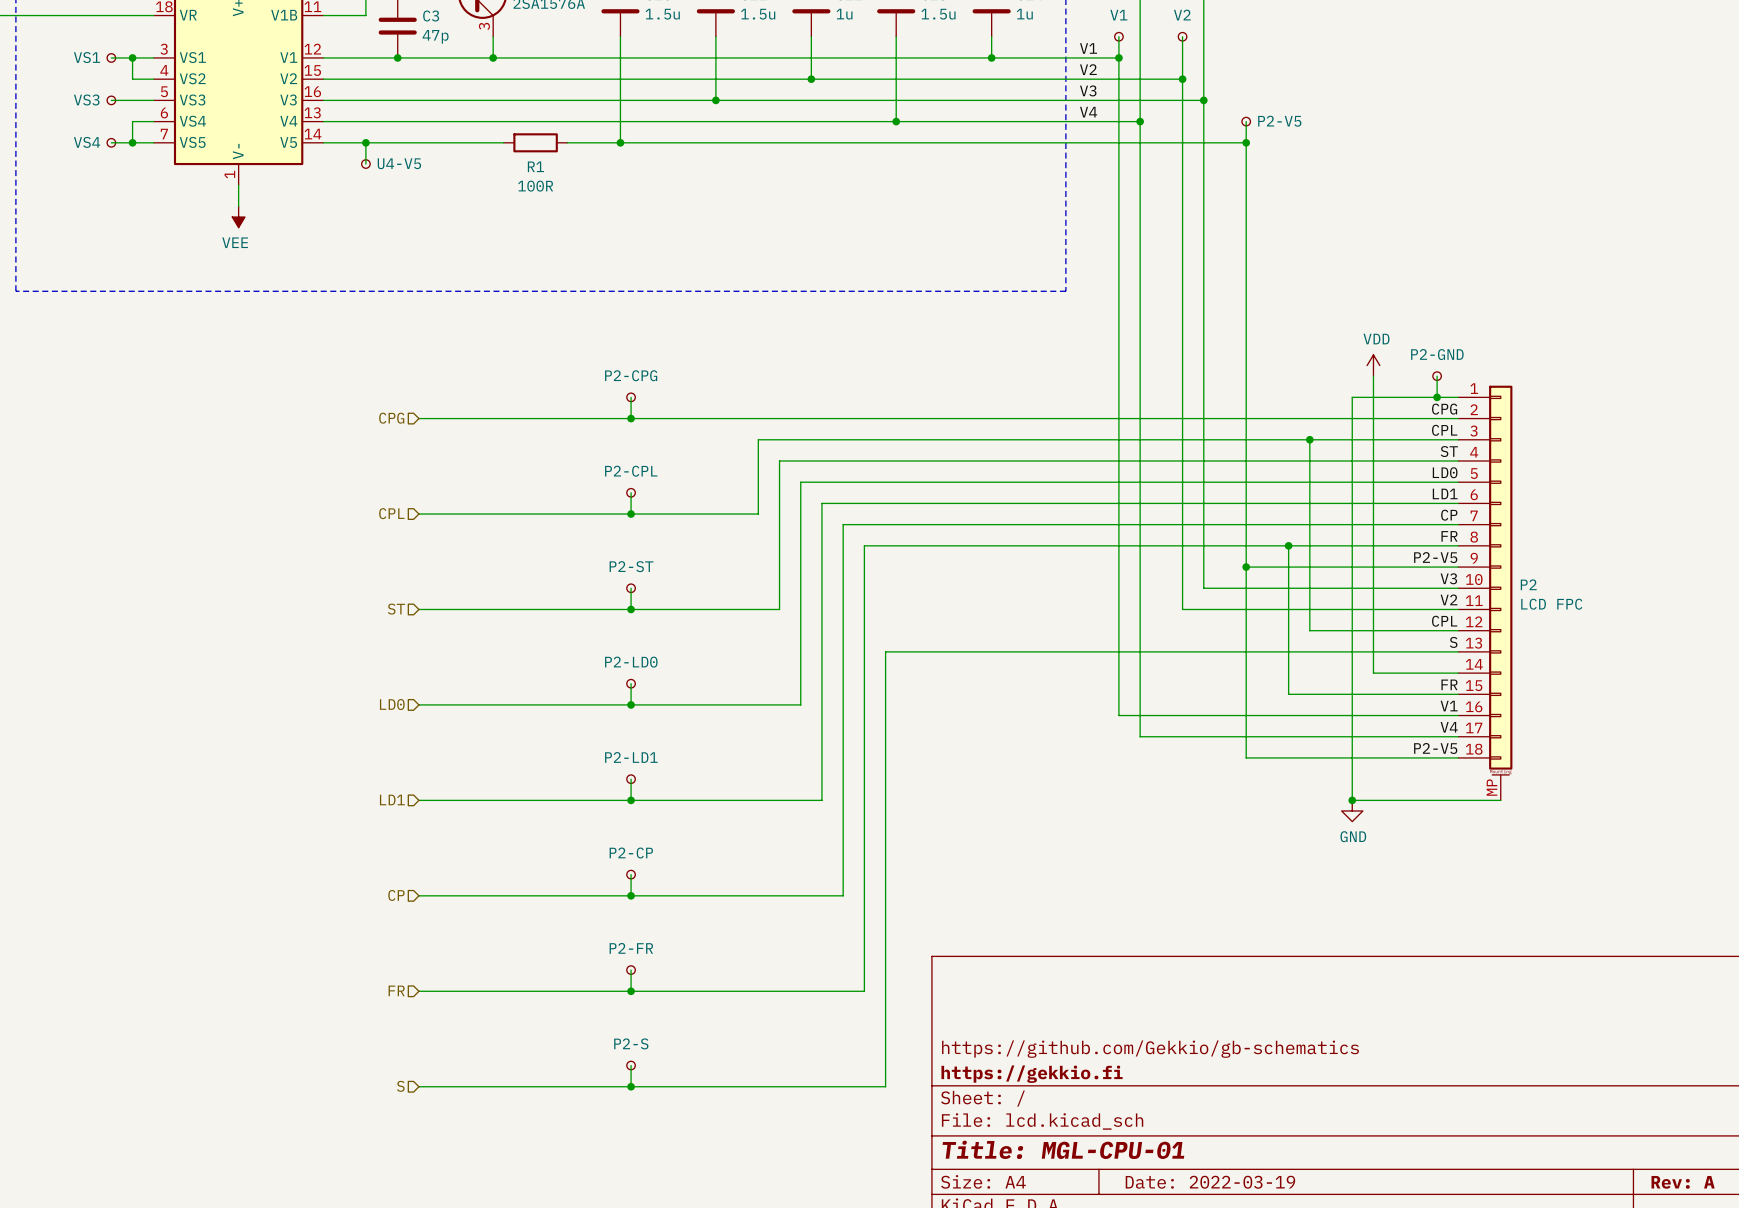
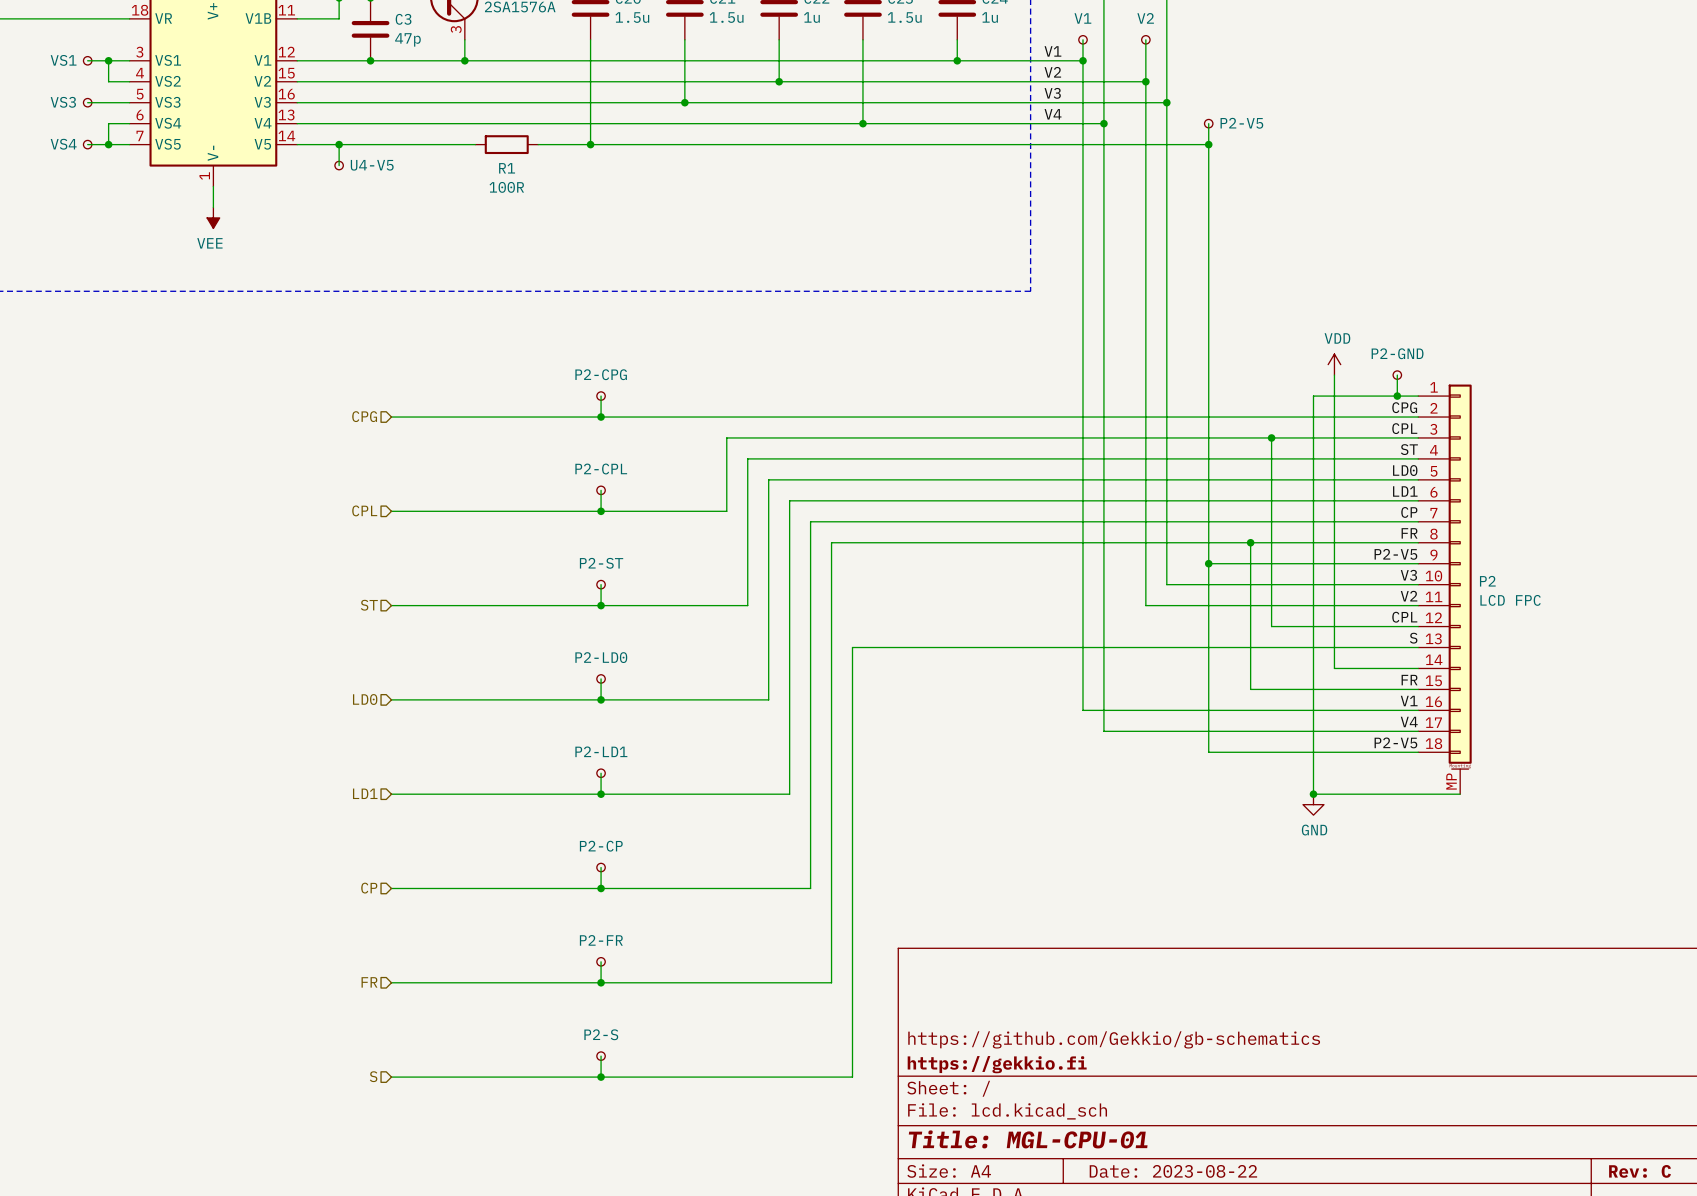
title block: Date: 2022-03-19 (1210, 1182) -> Date: 2023-08-22 (1173, 1171)
title block: Rev: A (1683, 1182) -> Rev: C (1640, 1171)

